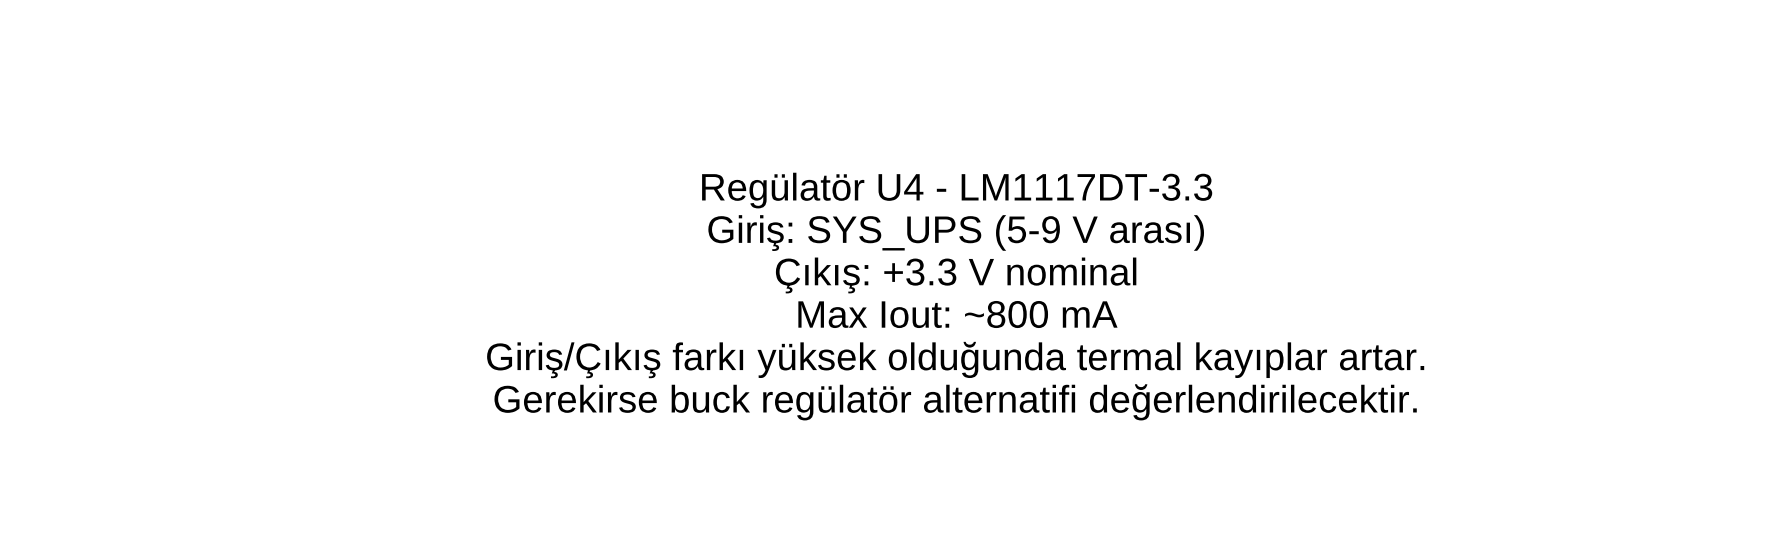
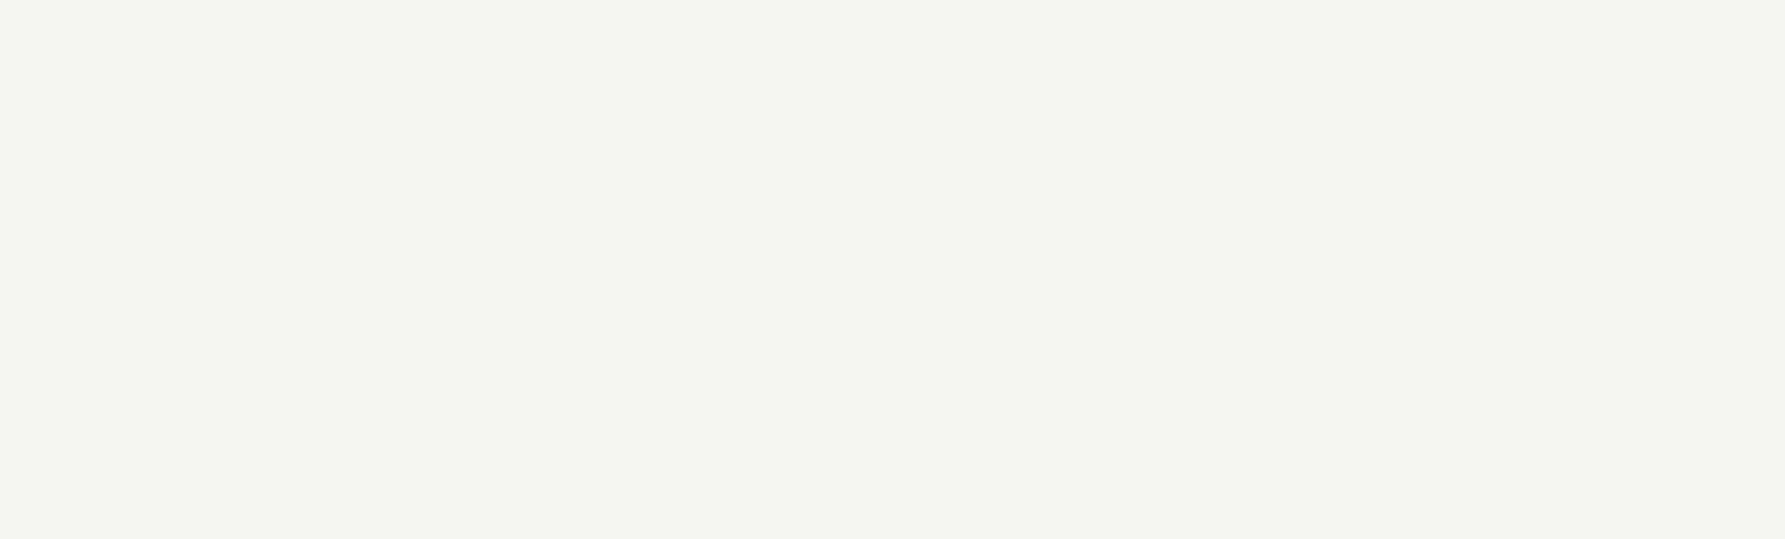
text: Regülatör U4 - LM1117DT-3.3 (957, 190) -> none
text: Giriş: SYS_UPS (5-9 V arası) (956, 233) -> none
text: Çıkış: +3.3 V nominal (956, 275) -> none
text: Max Iout: ~800 mA (957, 314) -> none
text: Giriş/Çıkış farkı yüksek olduğunda termal kayıplar artar. (955, 360) -> none
text: Gerekirse buck regülatör alternatifi değerlendirilecektir. (955, 402) -> none

